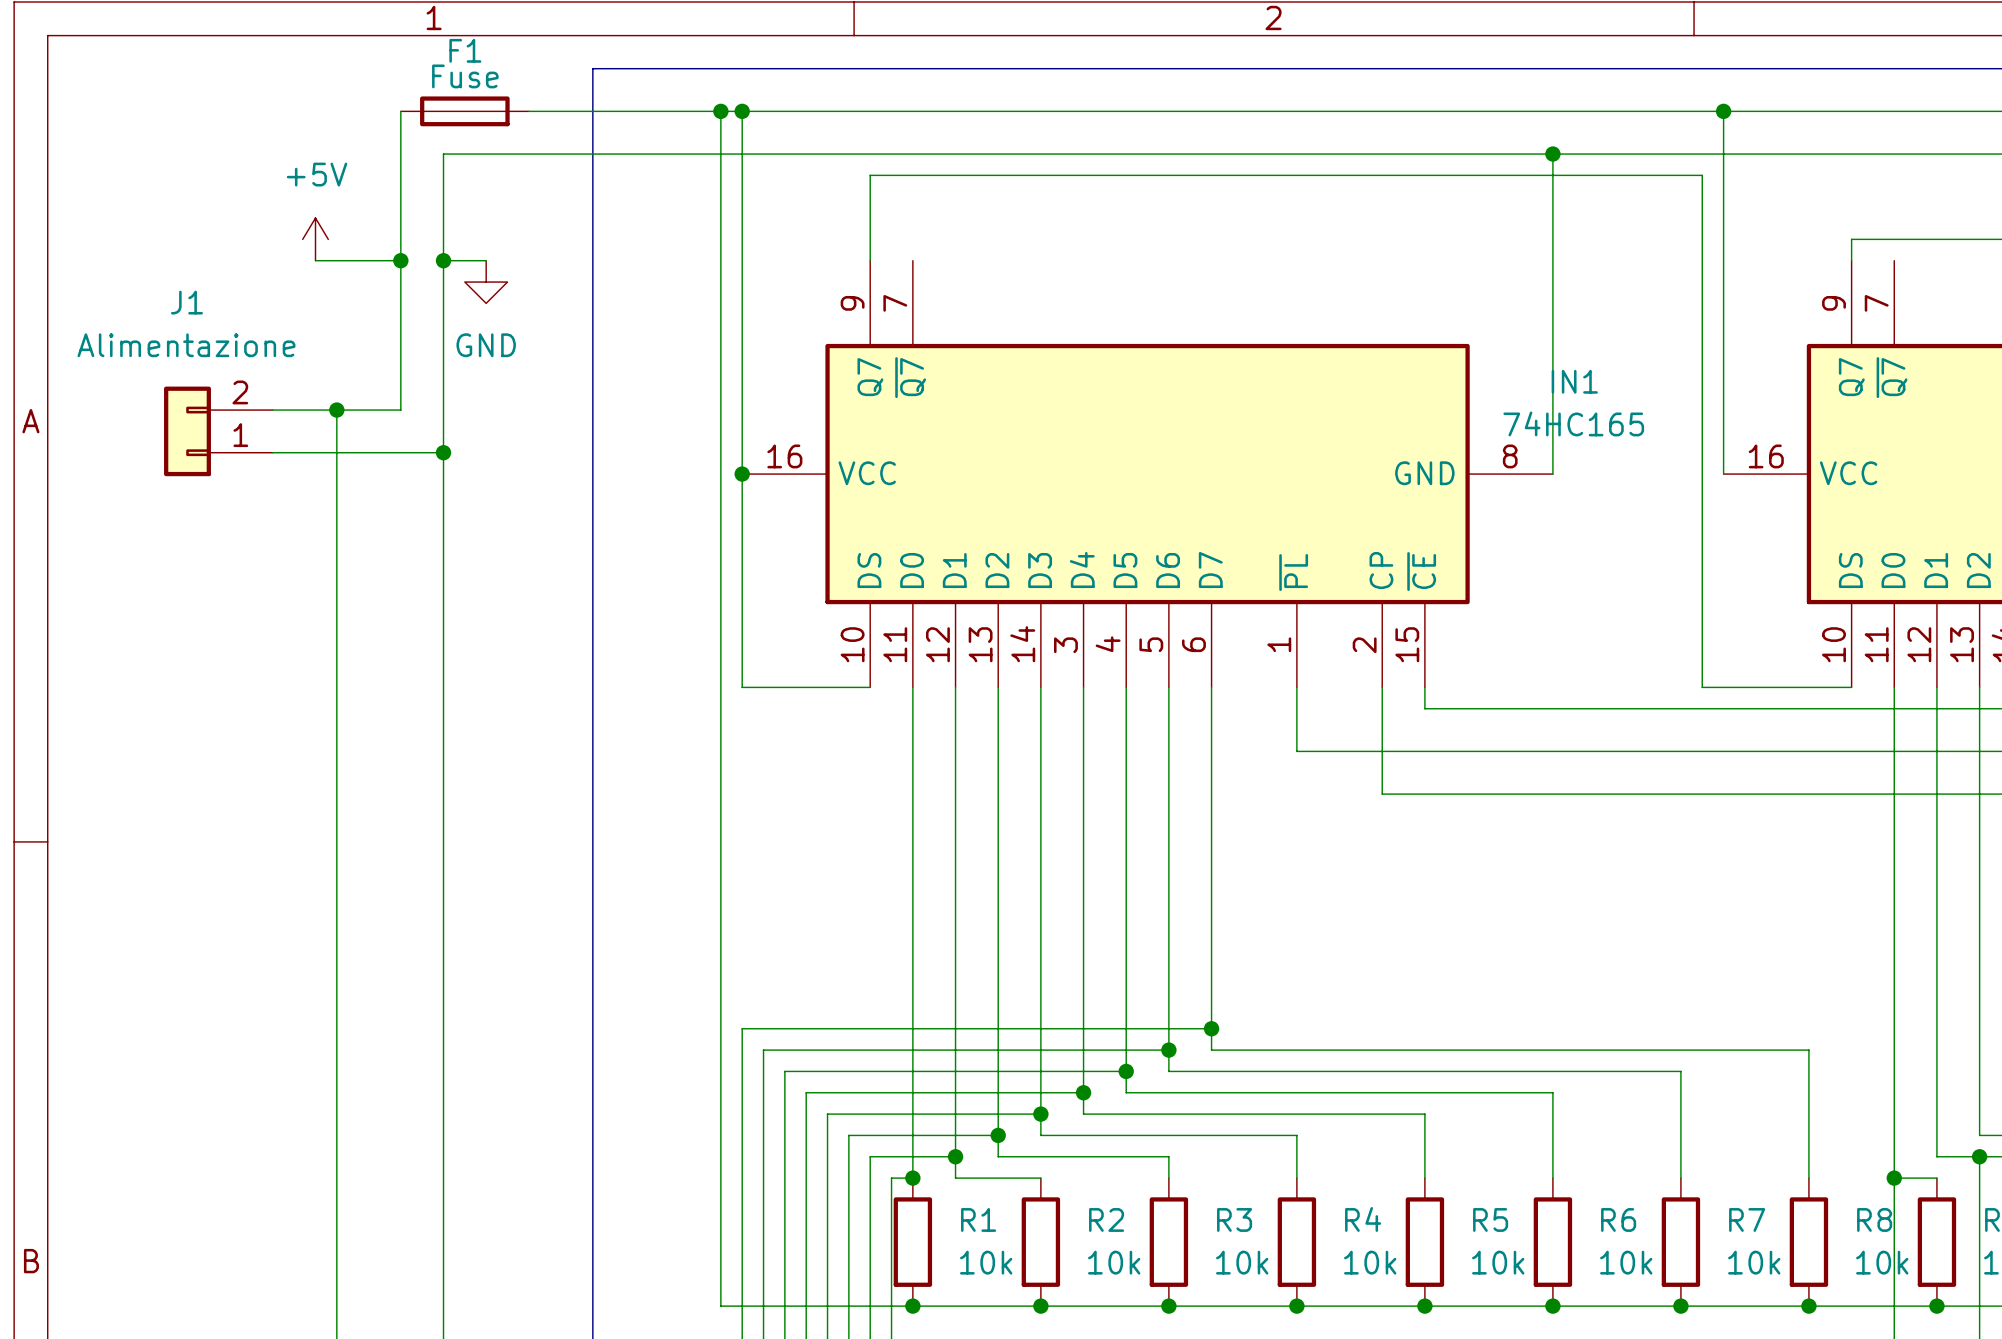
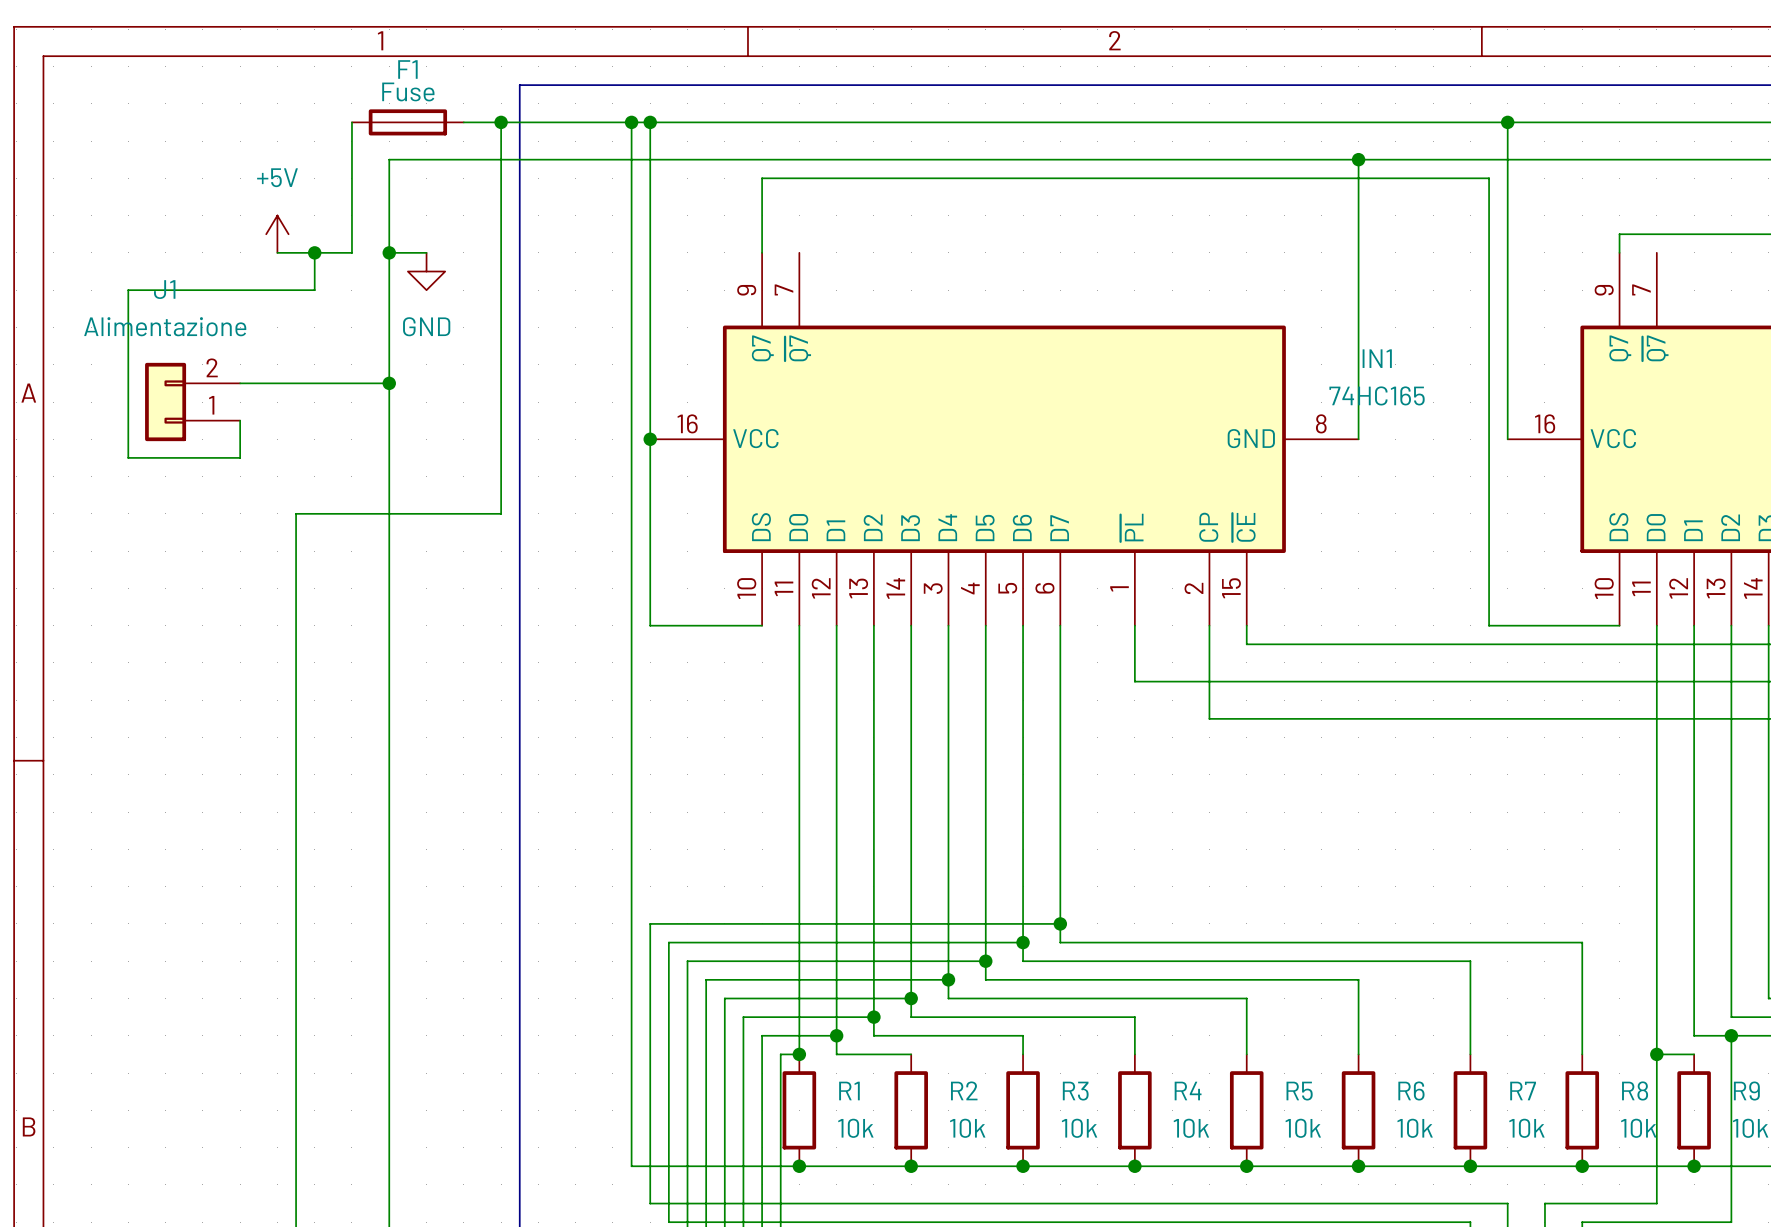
junction: none -> (501, 122)
wire: (400, 260) (400, 410) -> (389, 383) (351, 383)
junction position: (400, 260) -> (314, 252)
wire: (336, 410) (336, 559) -> (501, 122) (501, 513) (296, 513)
junction: (336, 410) -> none
wire: (272, 452) (443, 452) -> (240, 420) (240, 457) (128, 457) (128, 290) (314, 290) (314, 252)
junction position: (443, 452) -> (389, 383)

